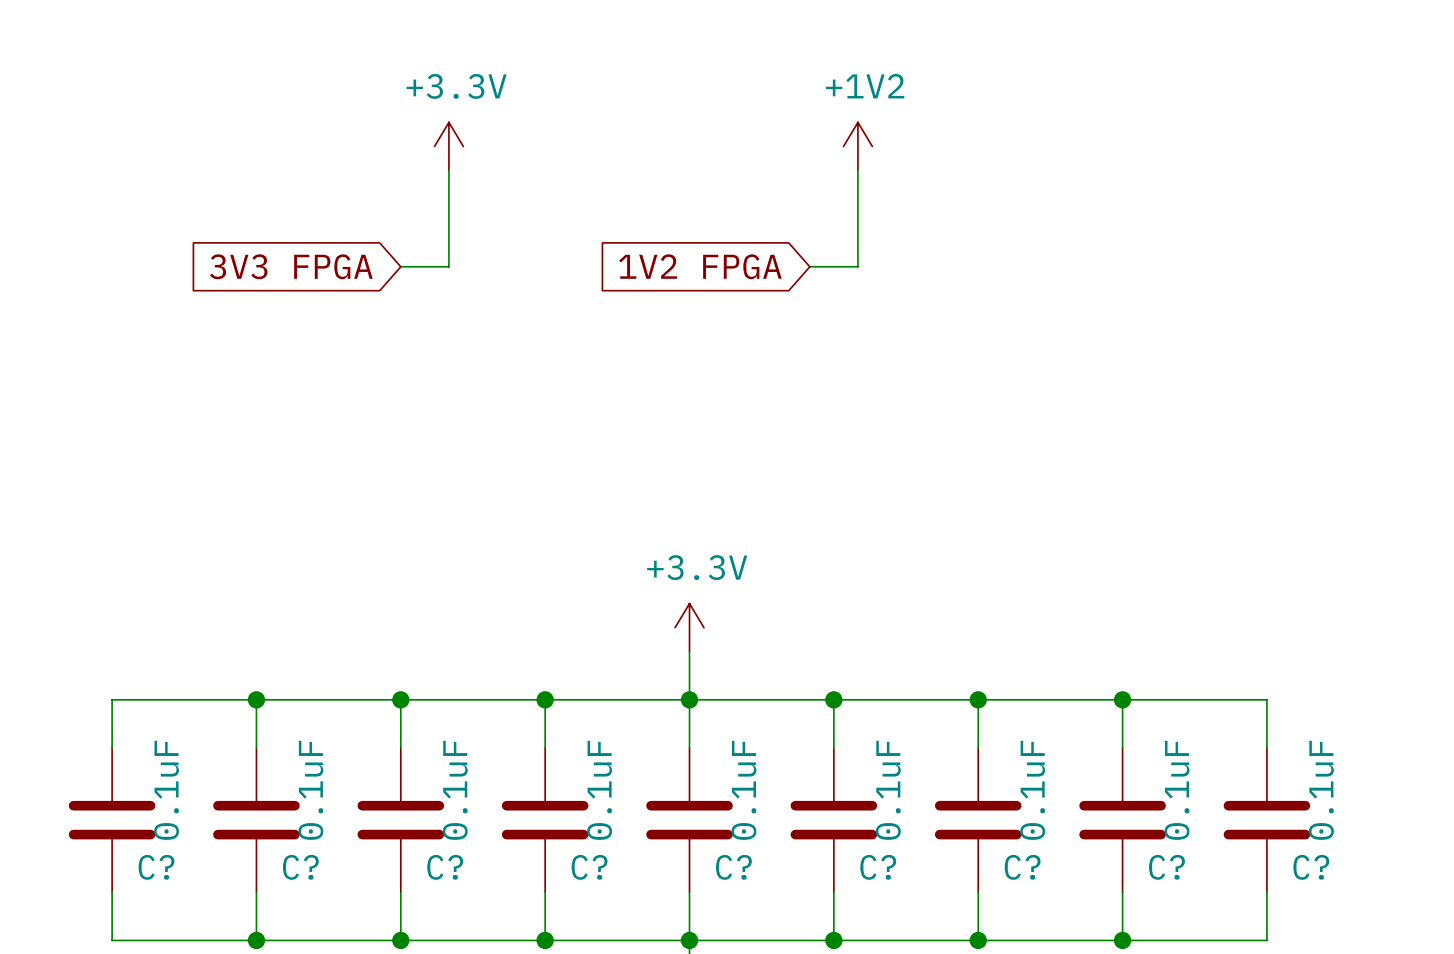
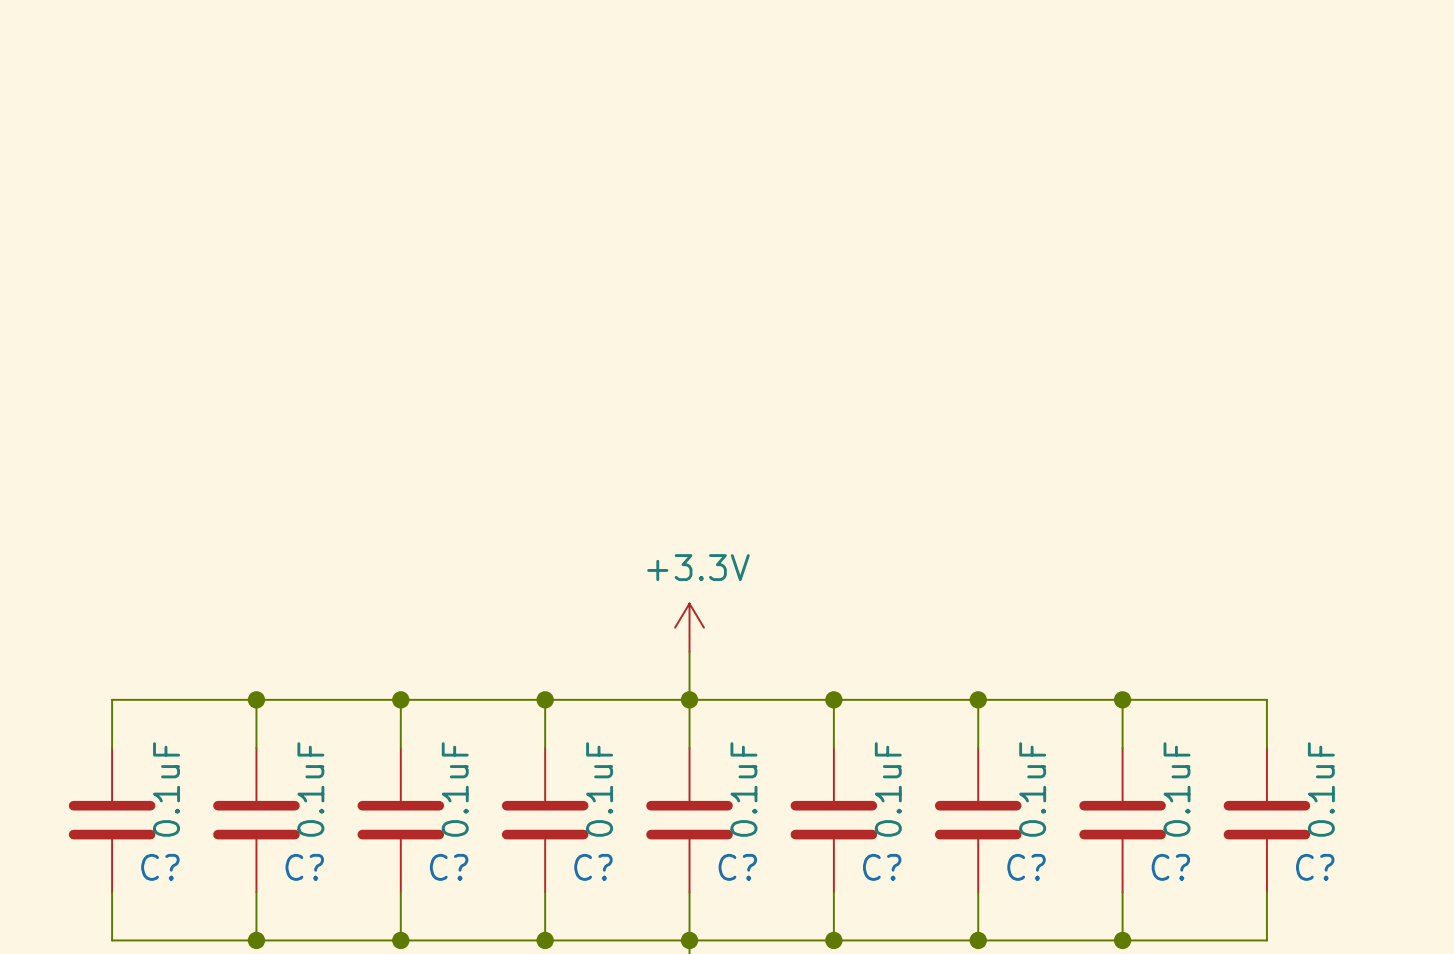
power symbol: +3.3V (448, 146) -> none
power symbol: +1V2 (857, 146) -> none
wire: (448, 170) (448, 266) (400, 266) -> none
wire: (857, 170) (857, 266) (809, 266) -> none
global label: 3V3 FPGA (291, 266) -> none
global label: 1V2 FPGA (700, 266) -> none

